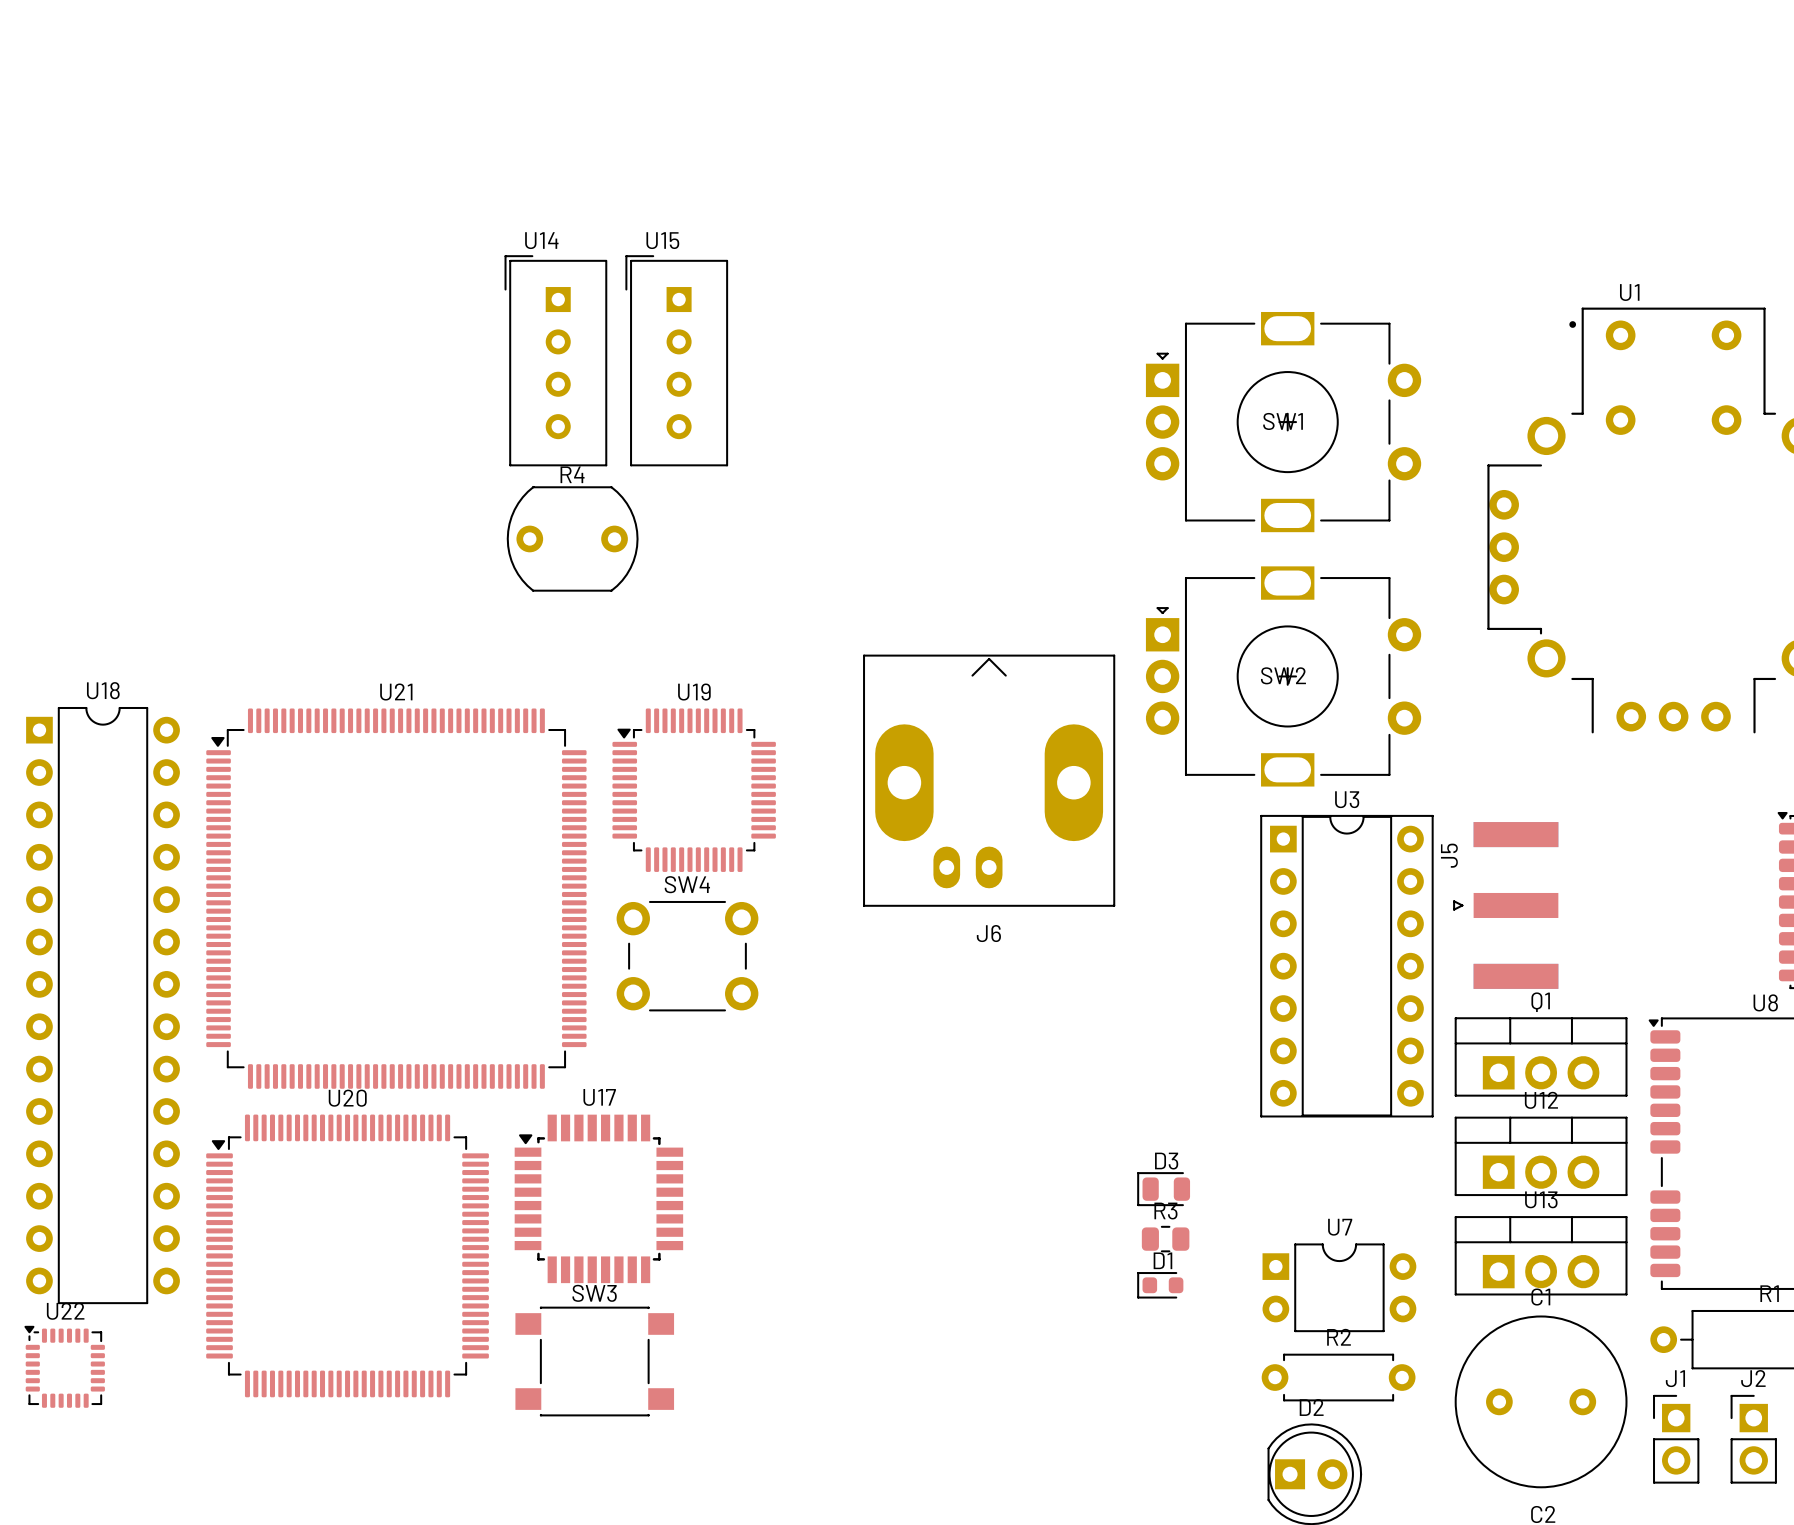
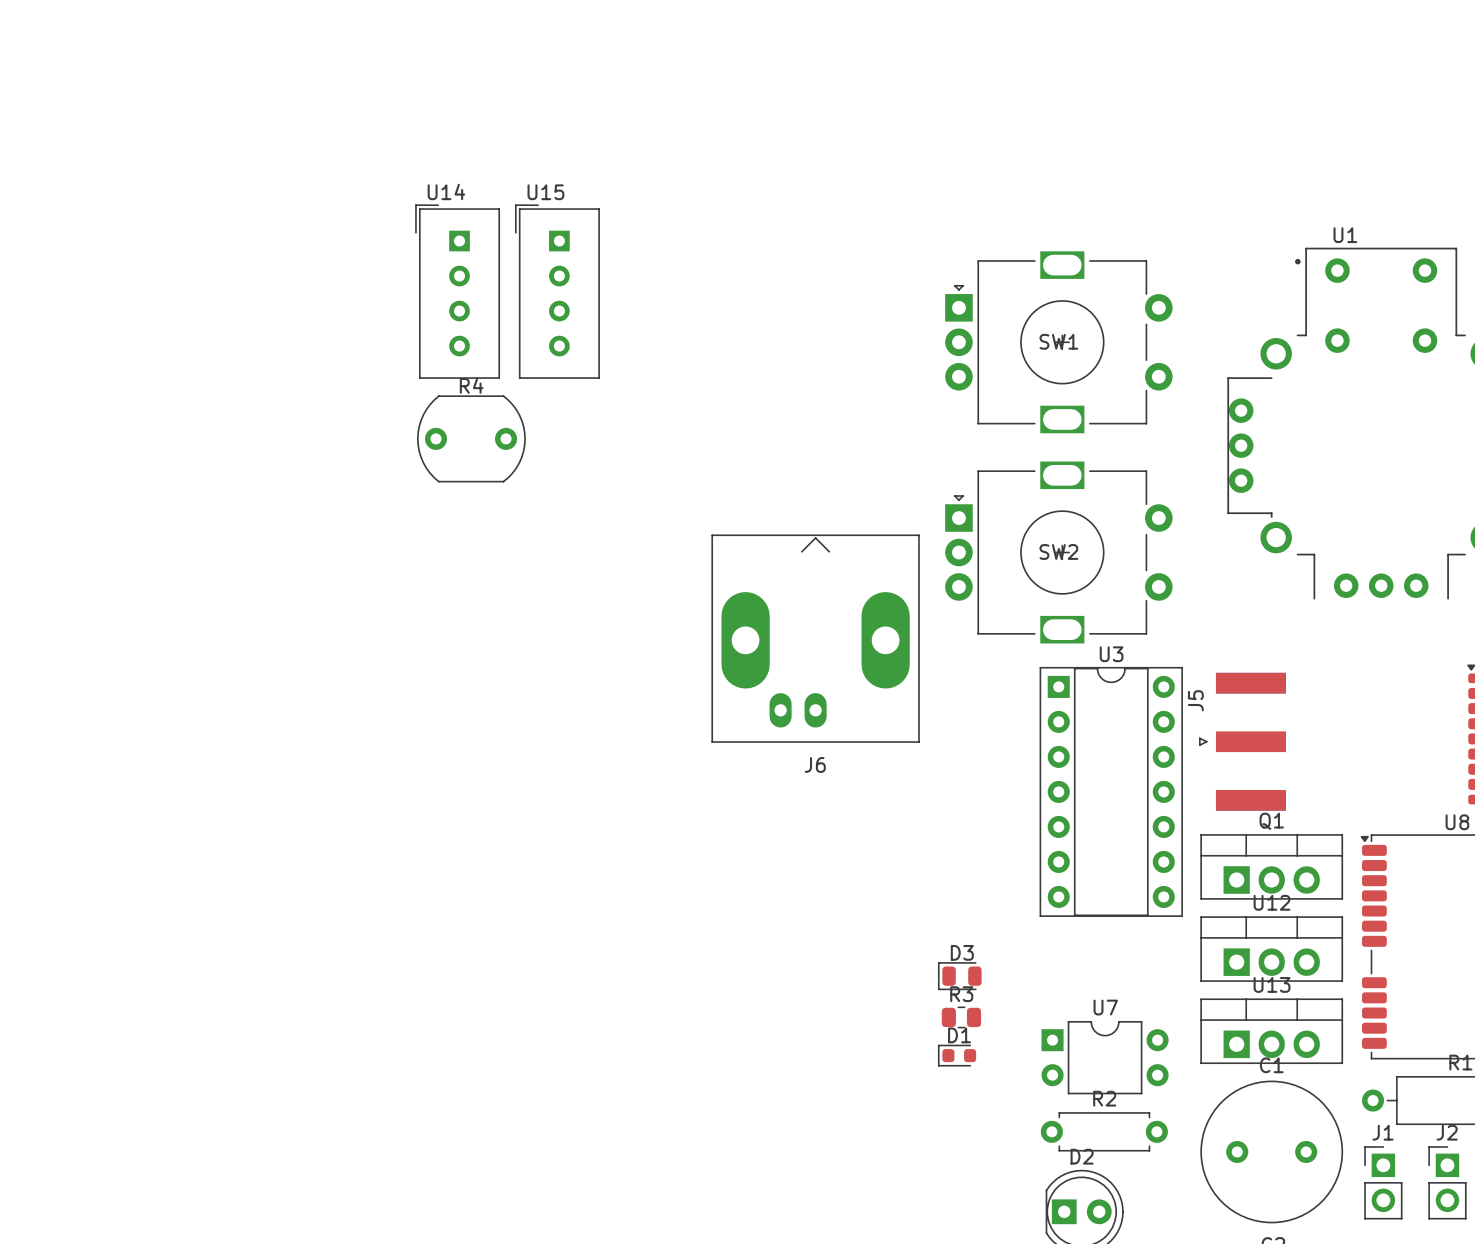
U19: (694, 790) -> none
U21: (396, 898) -> none
SW4: (687, 956) -> none
U18: (103, 1005) -> none
U17: (598, 1198) -> none
U20: (347, 1255) -> none
SW3: (594, 1361) -> none
U22: (64, 1366) -> none

